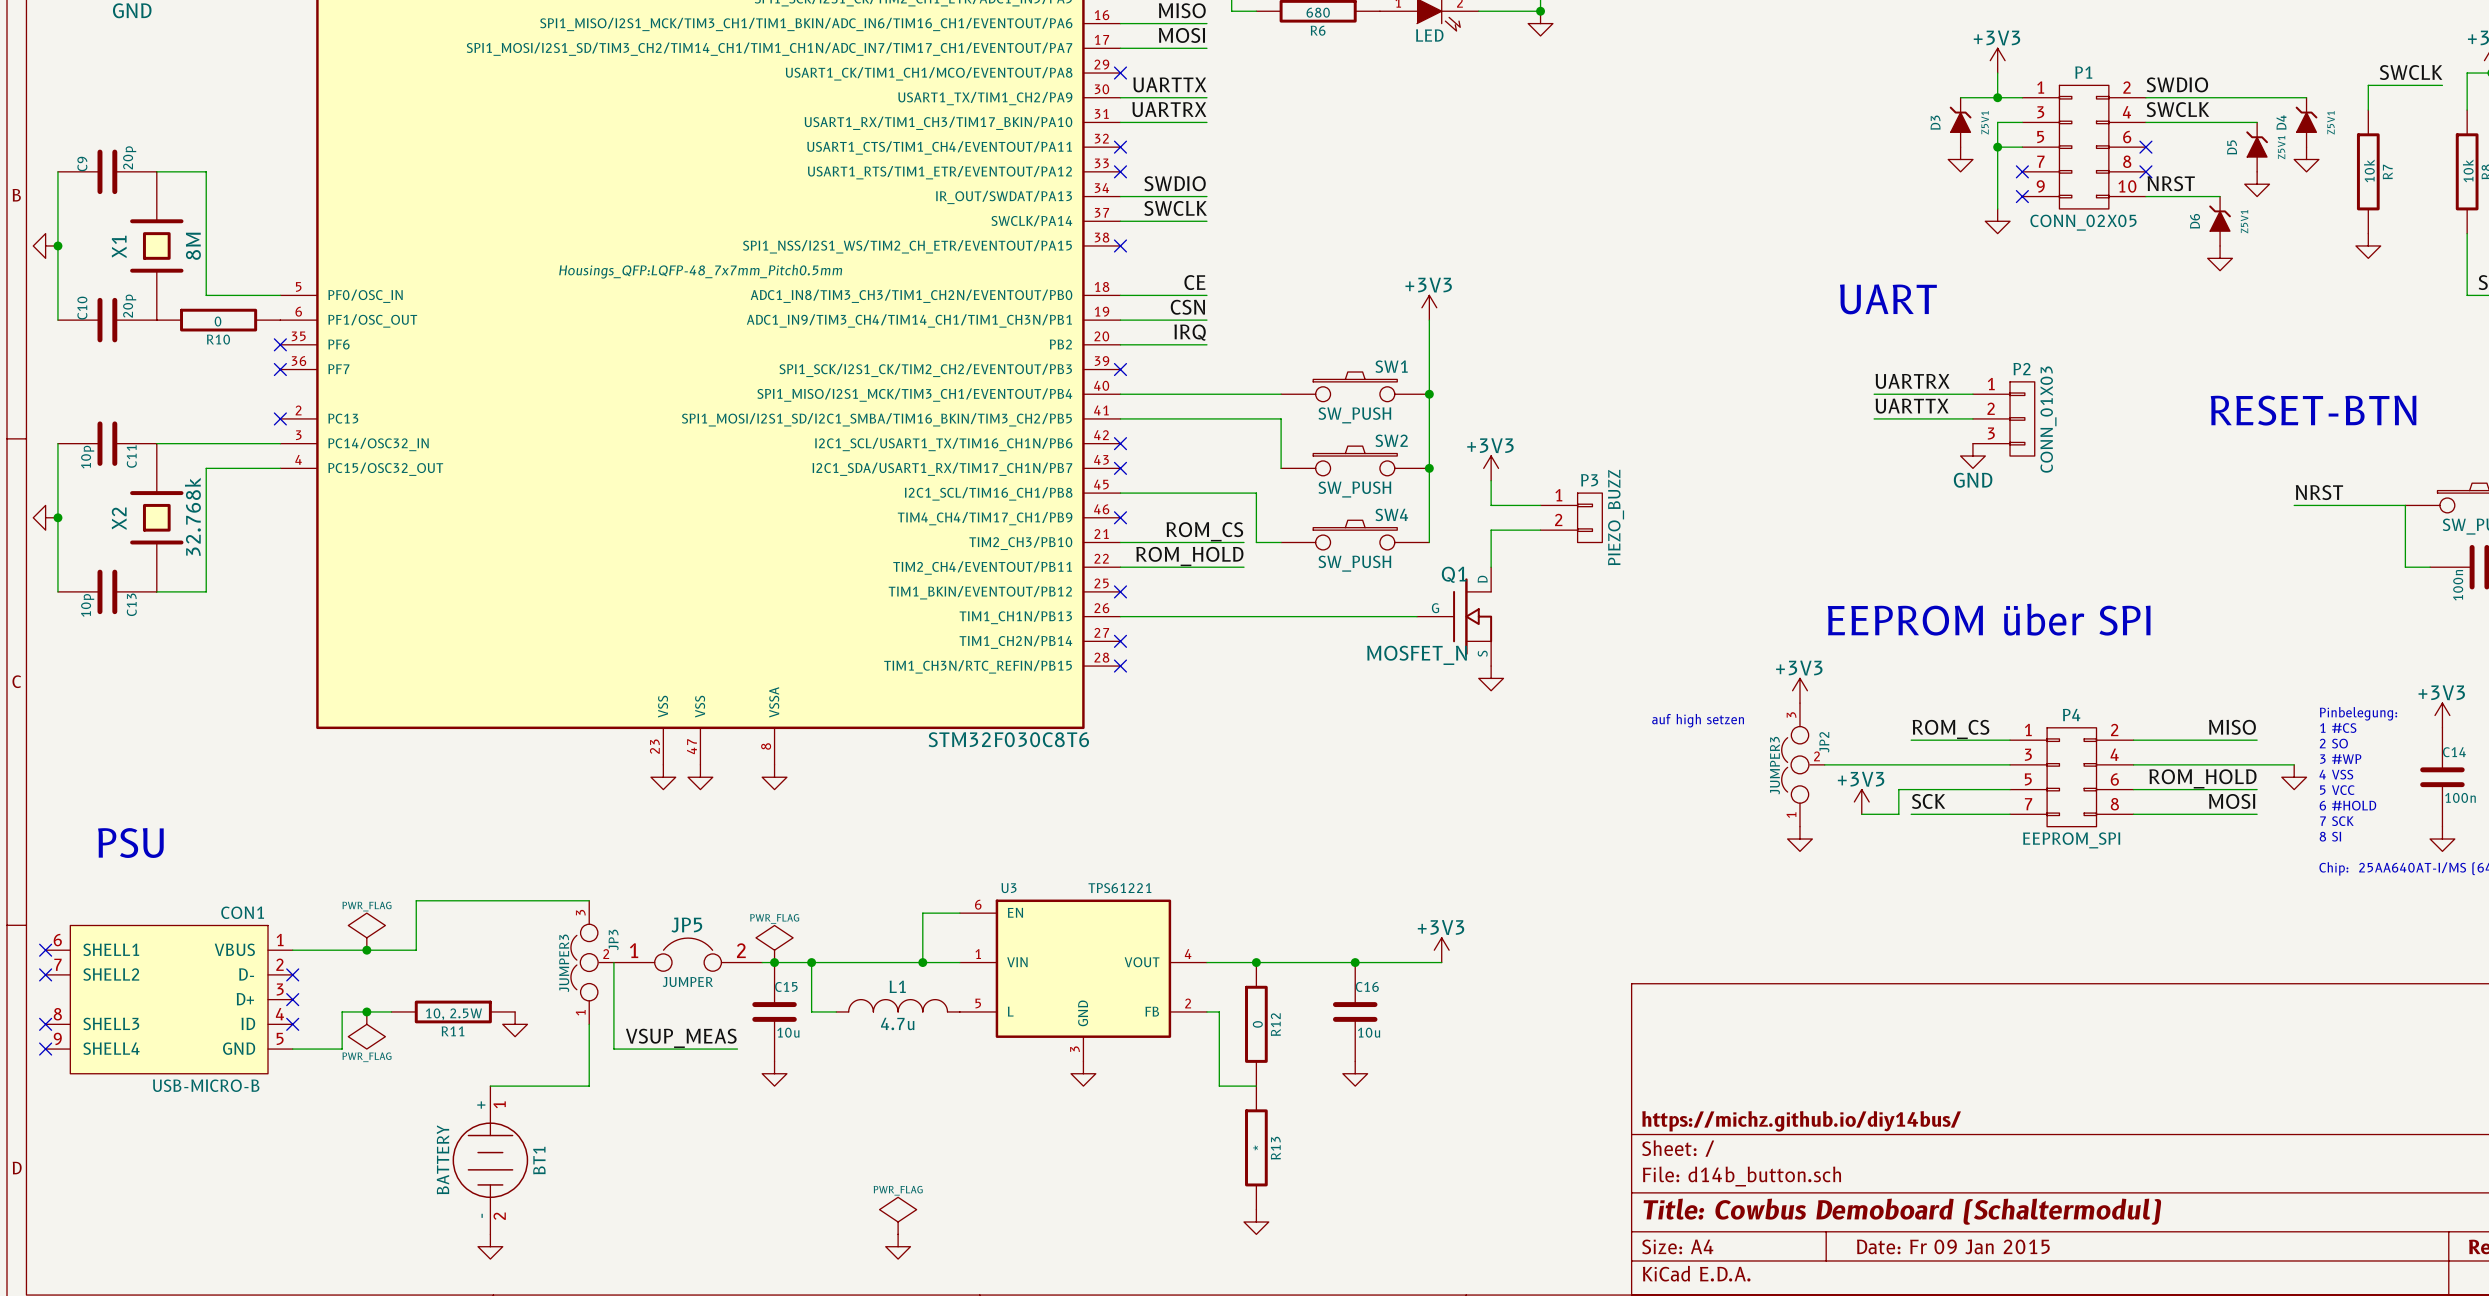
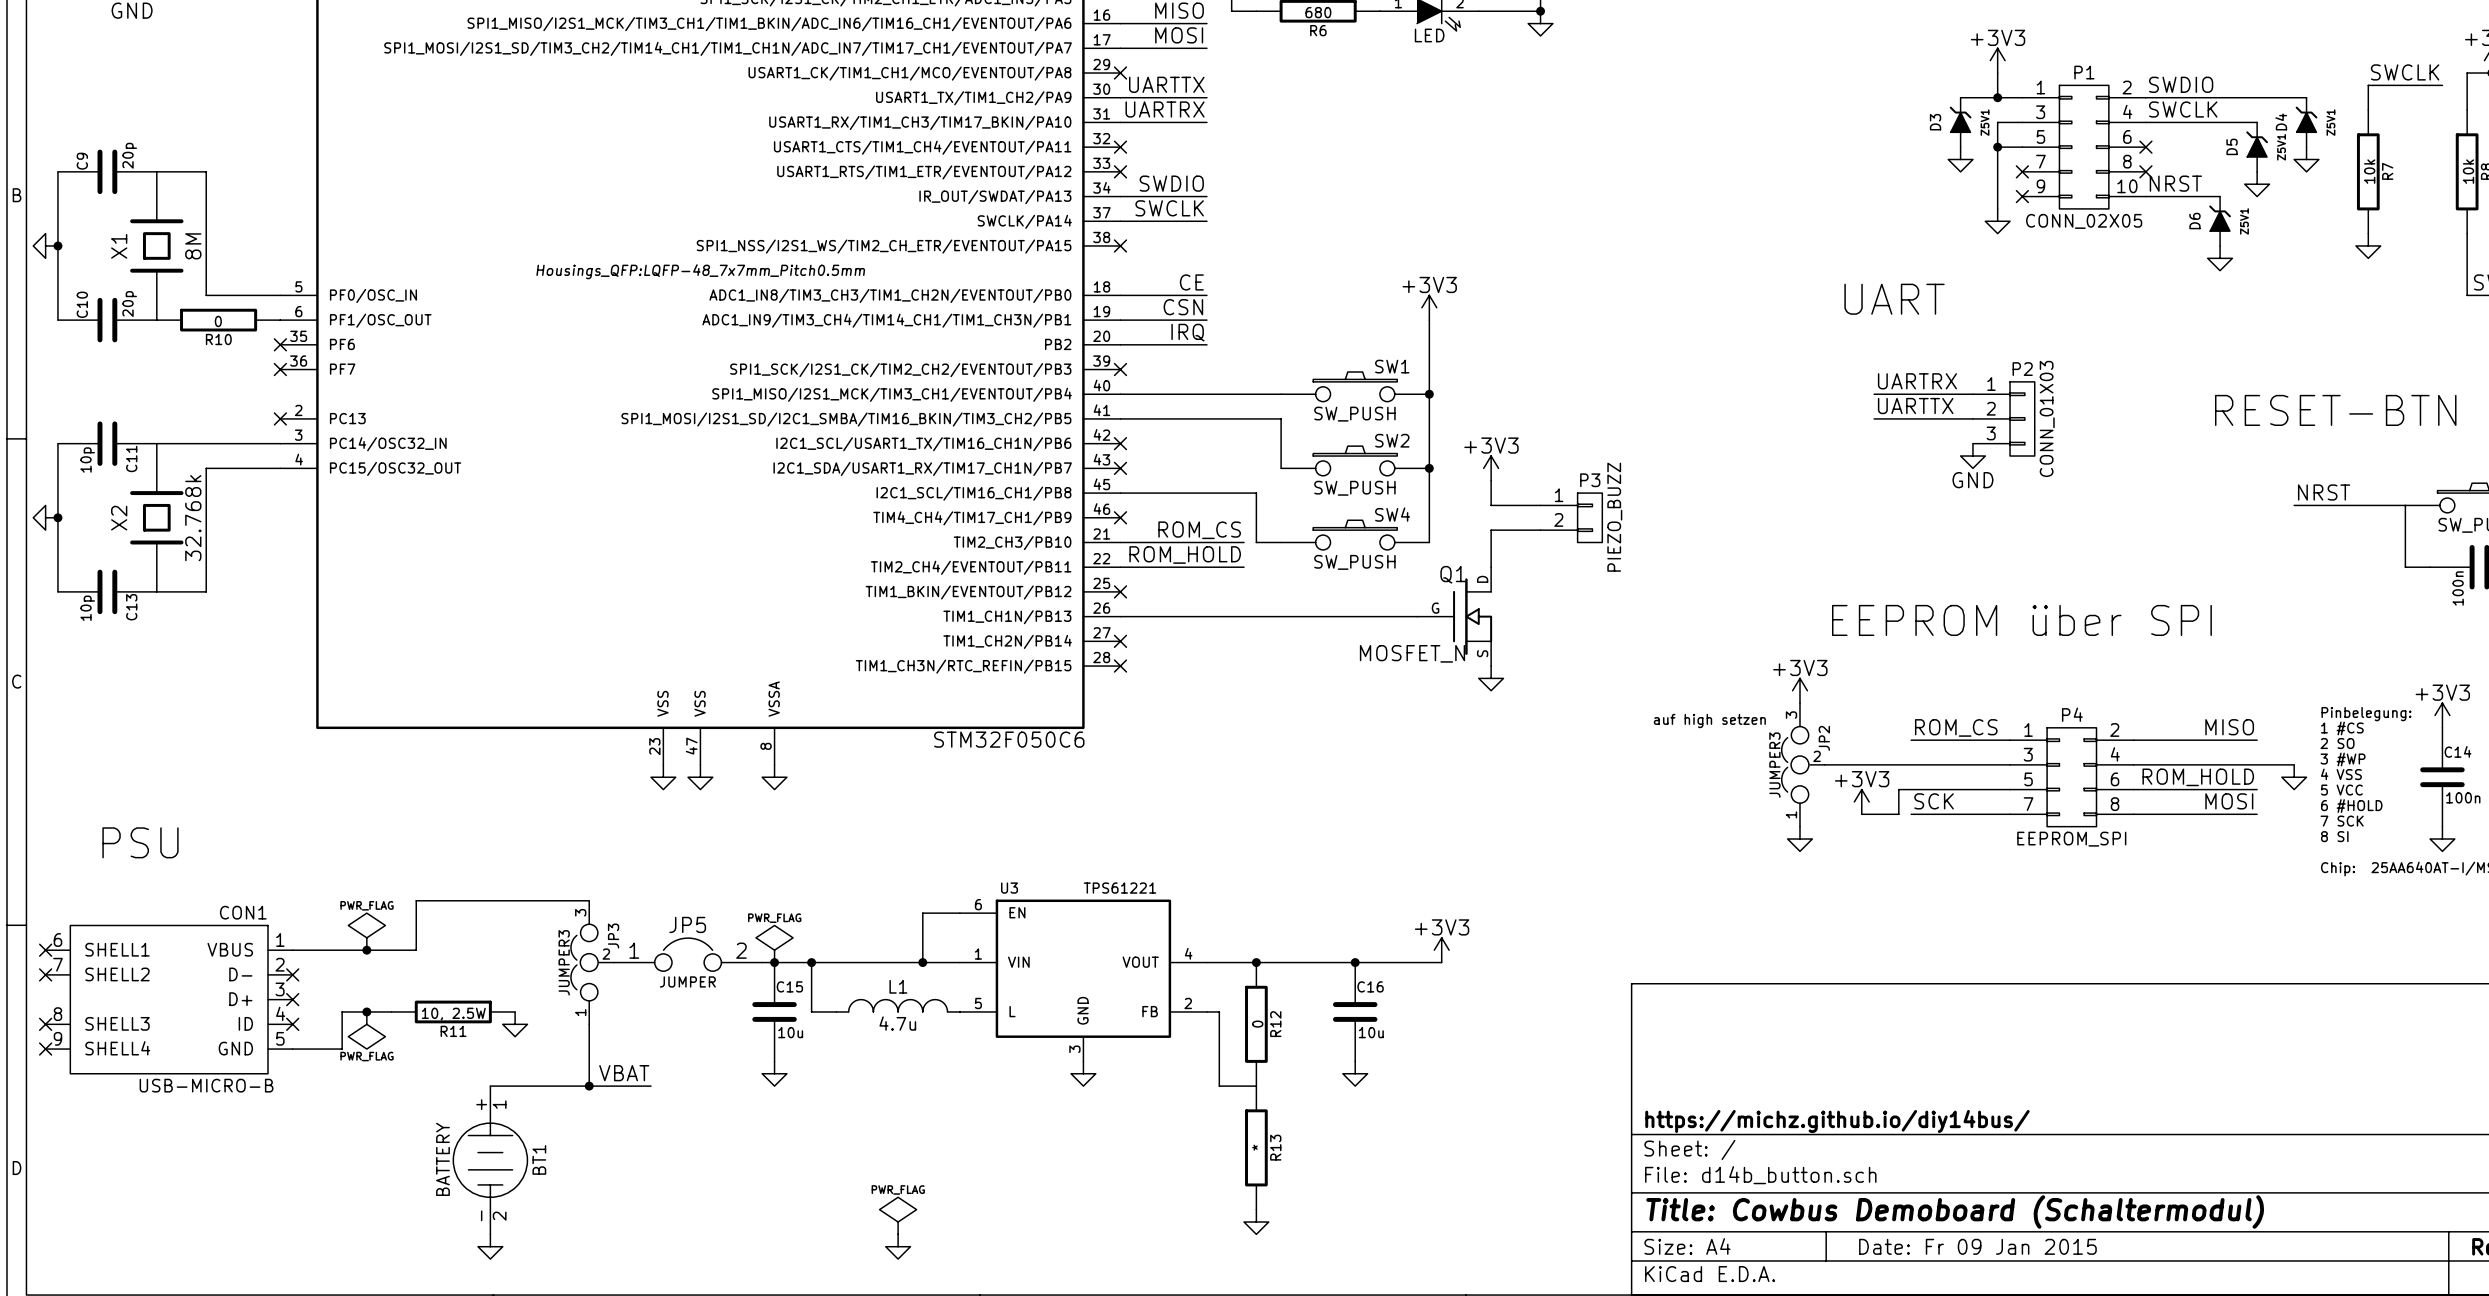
part value: STM32F030C8T6 (1008, 739) -> STM32F050C6 (1009, 739)
wire: (613, 962) (613, 1049) (737, 1049) -> none
label: VSUP_MEAS (681, 1038) -> none
label: none -> VBAT (624, 1073)
wire: none -> (589, 1086) (651, 1086)
junction: none -> (589, 1086)

